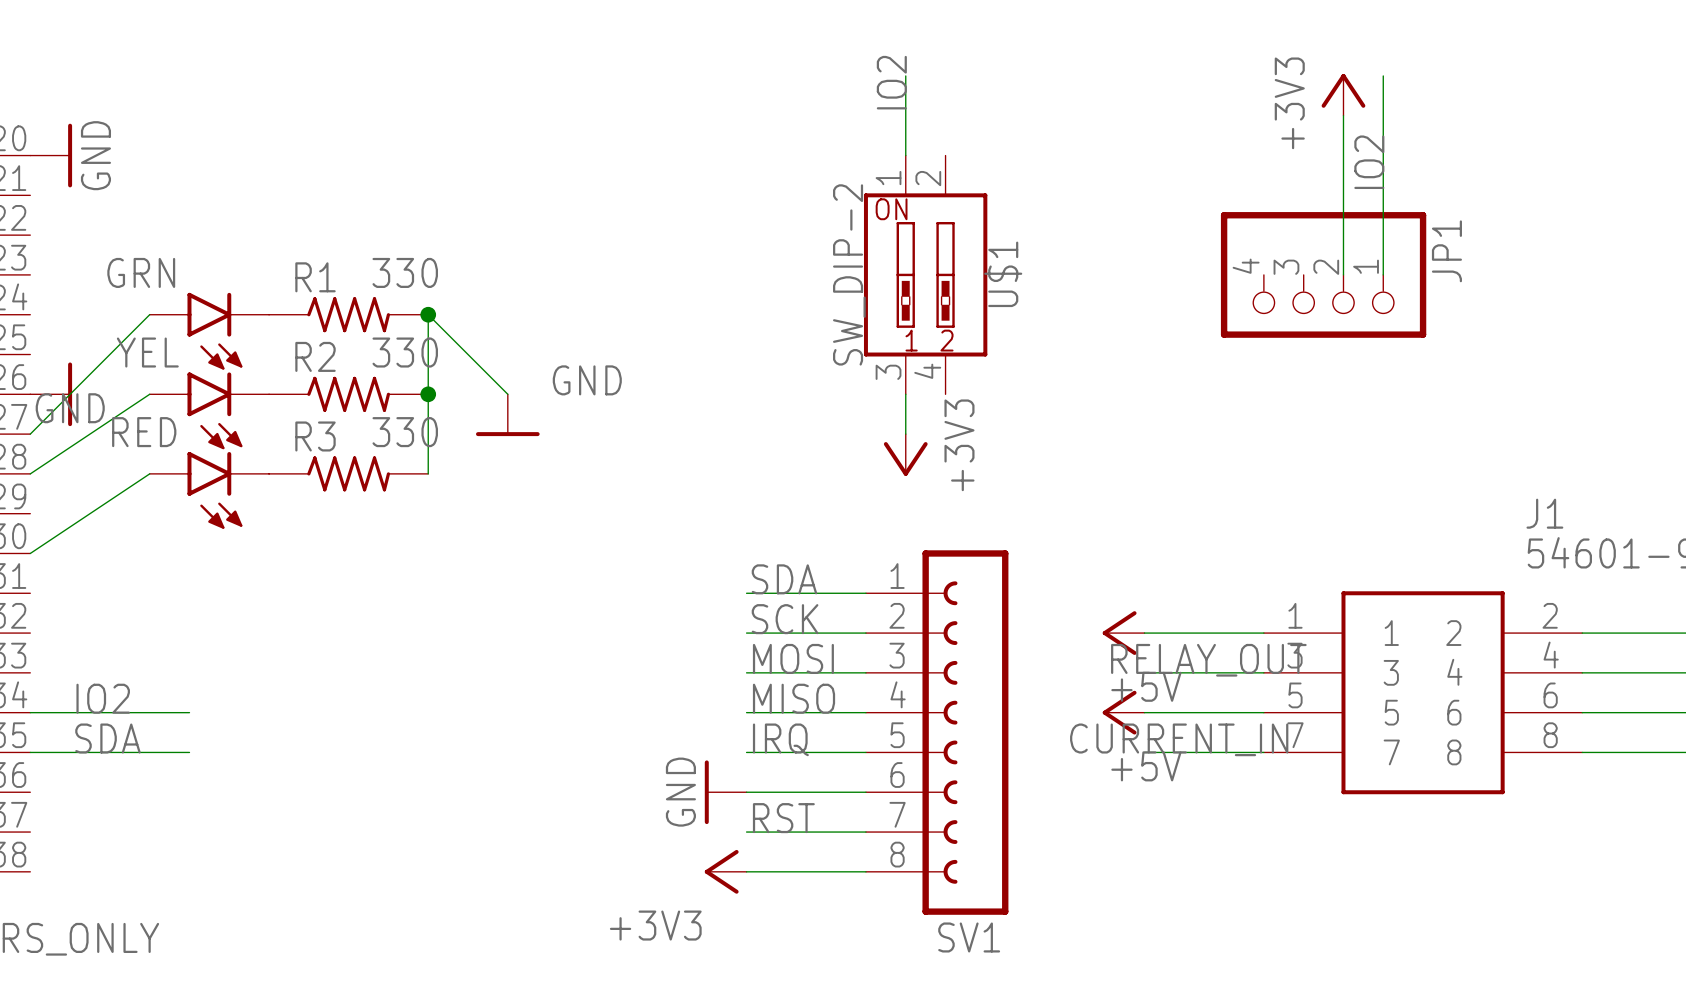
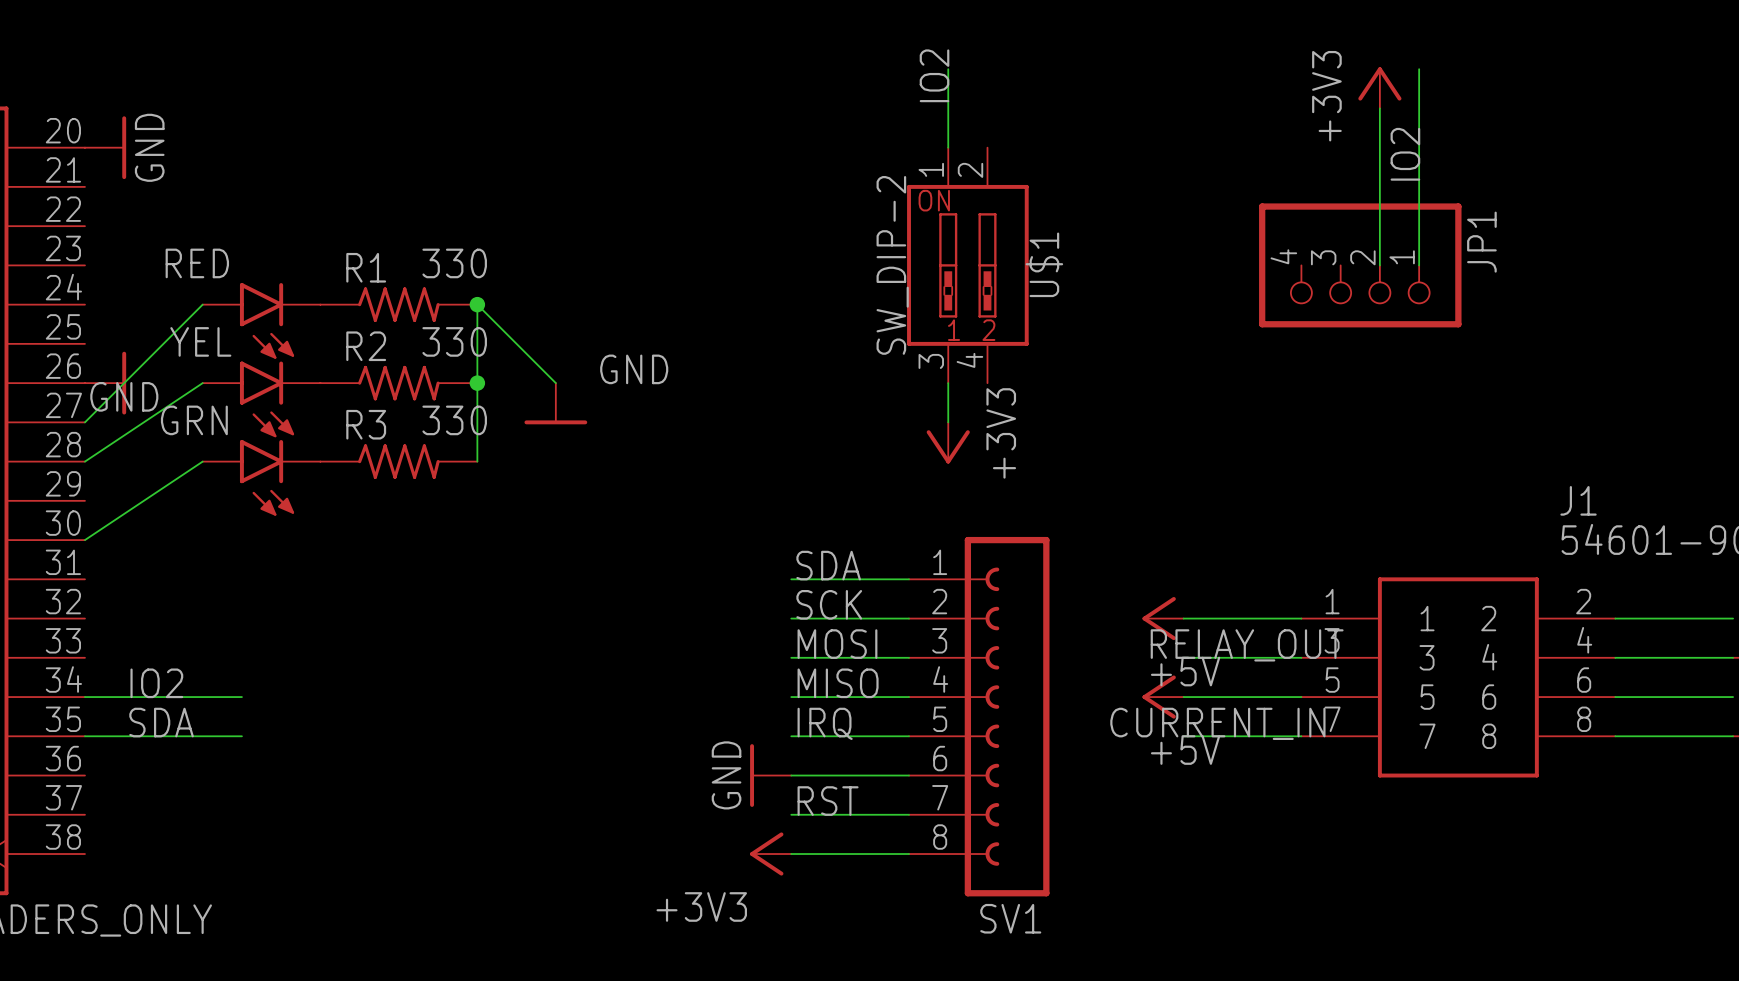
GRN name: GRN (141, 272) -> RED (197, 263)
RED name: RED (144, 432) -> GRN (194, 420)

